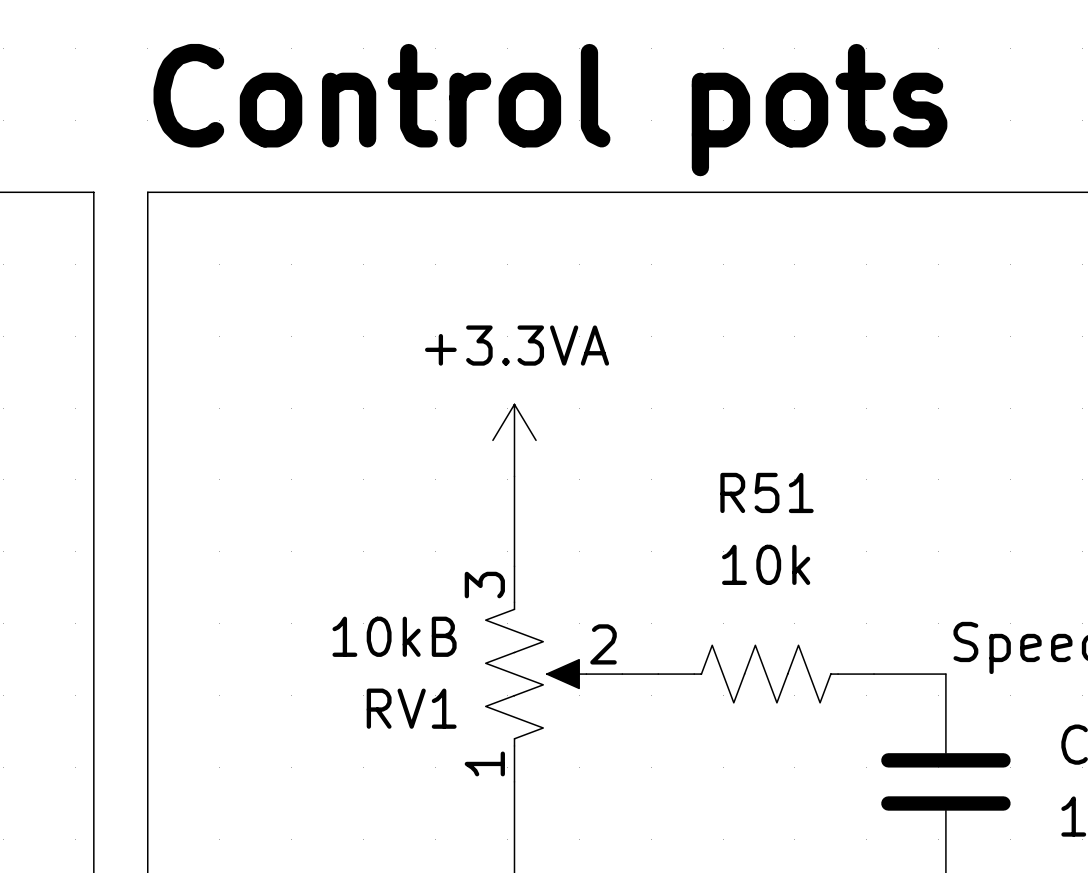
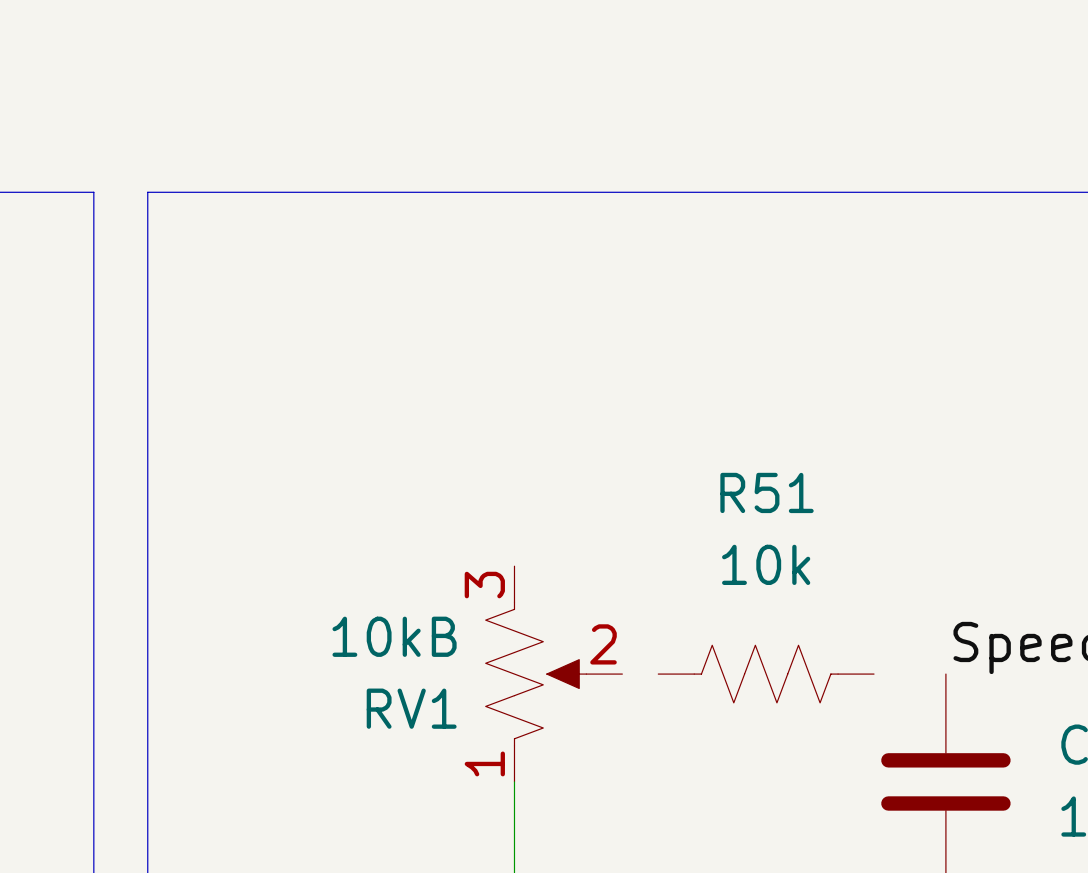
text: Control pots (550, 110) -> none
power symbol: +3.3VA (514, 440) -> none
wire: (514, 476) (514, 566) -> none
wire: (622, 674) (658, 674) -> none
wire: (874, 674) (945, 674) -> none

